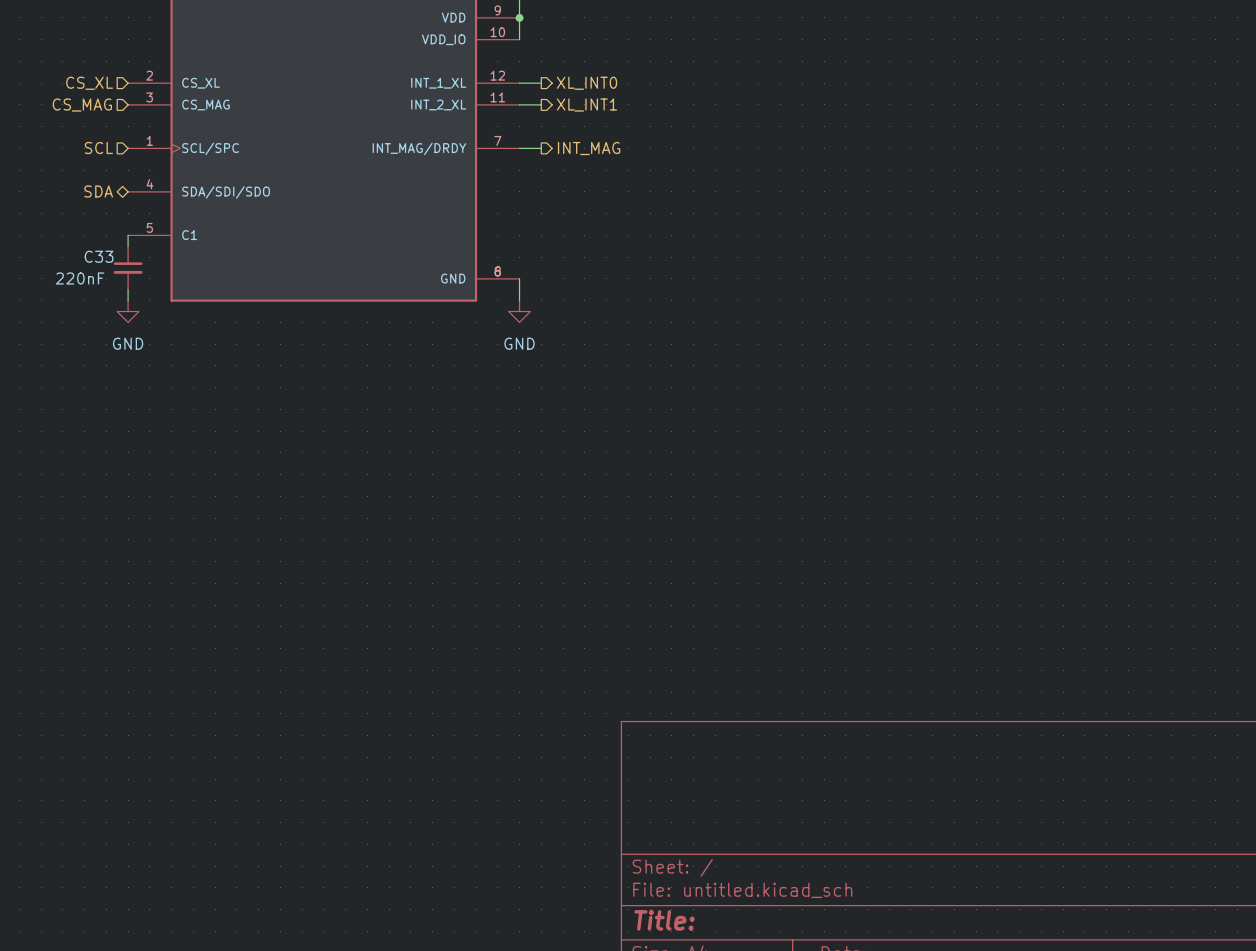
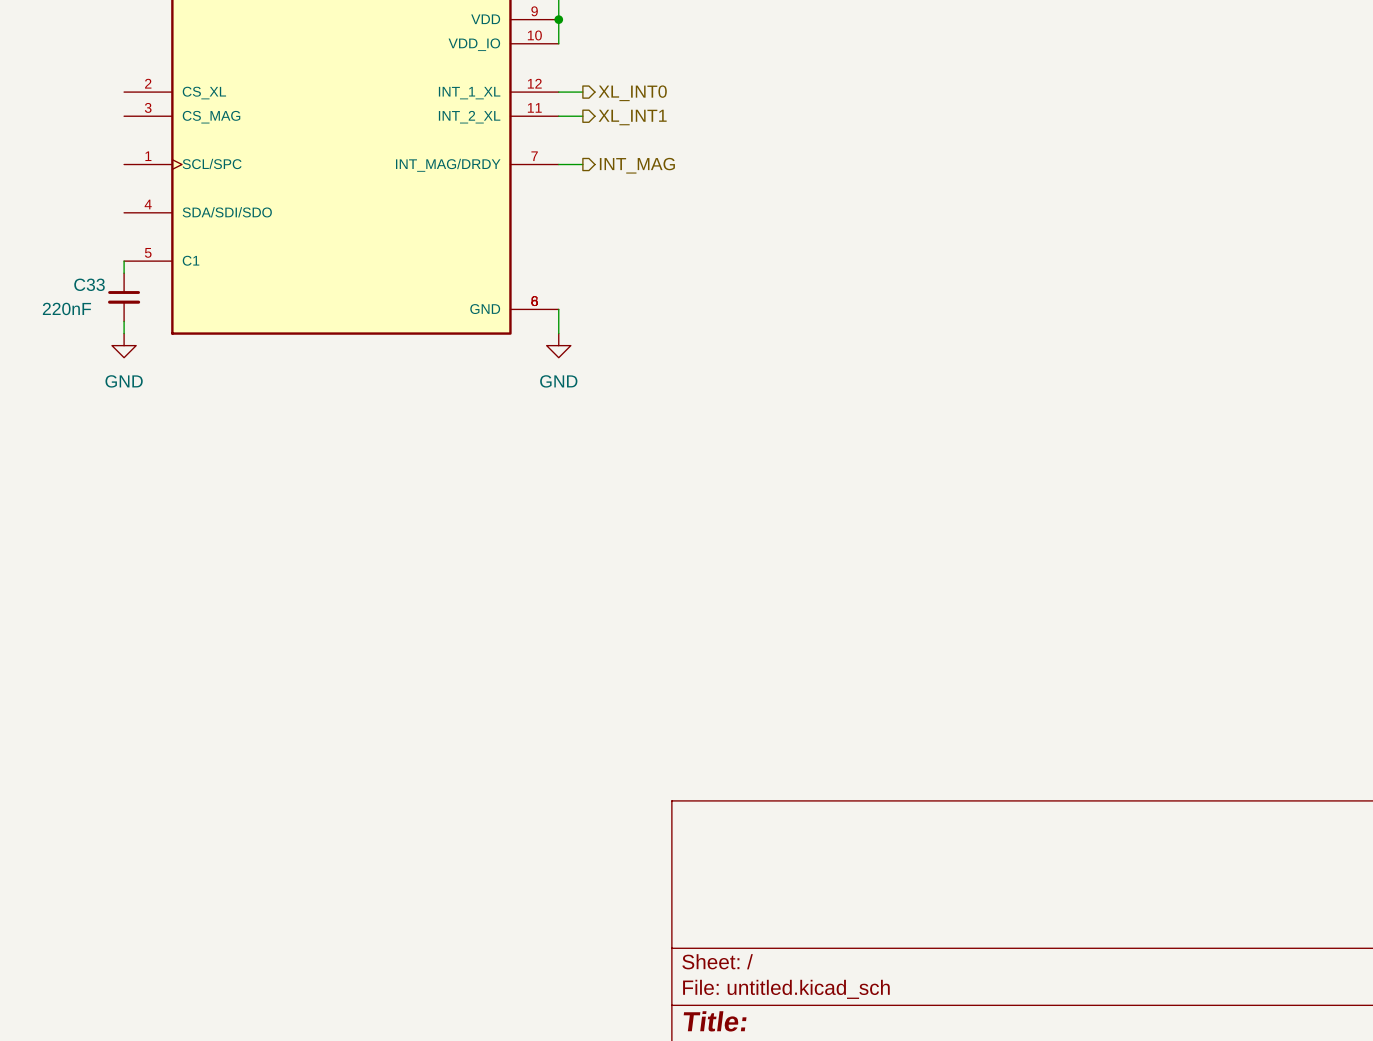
hierarchical label: CS_XL (89, 83) -> none
hierarchical label: CS_MAG (82, 105) -> none
hierarchical label: SCL (98, 148) -> none
hierarchical label: SDA (98, 191) -> none

